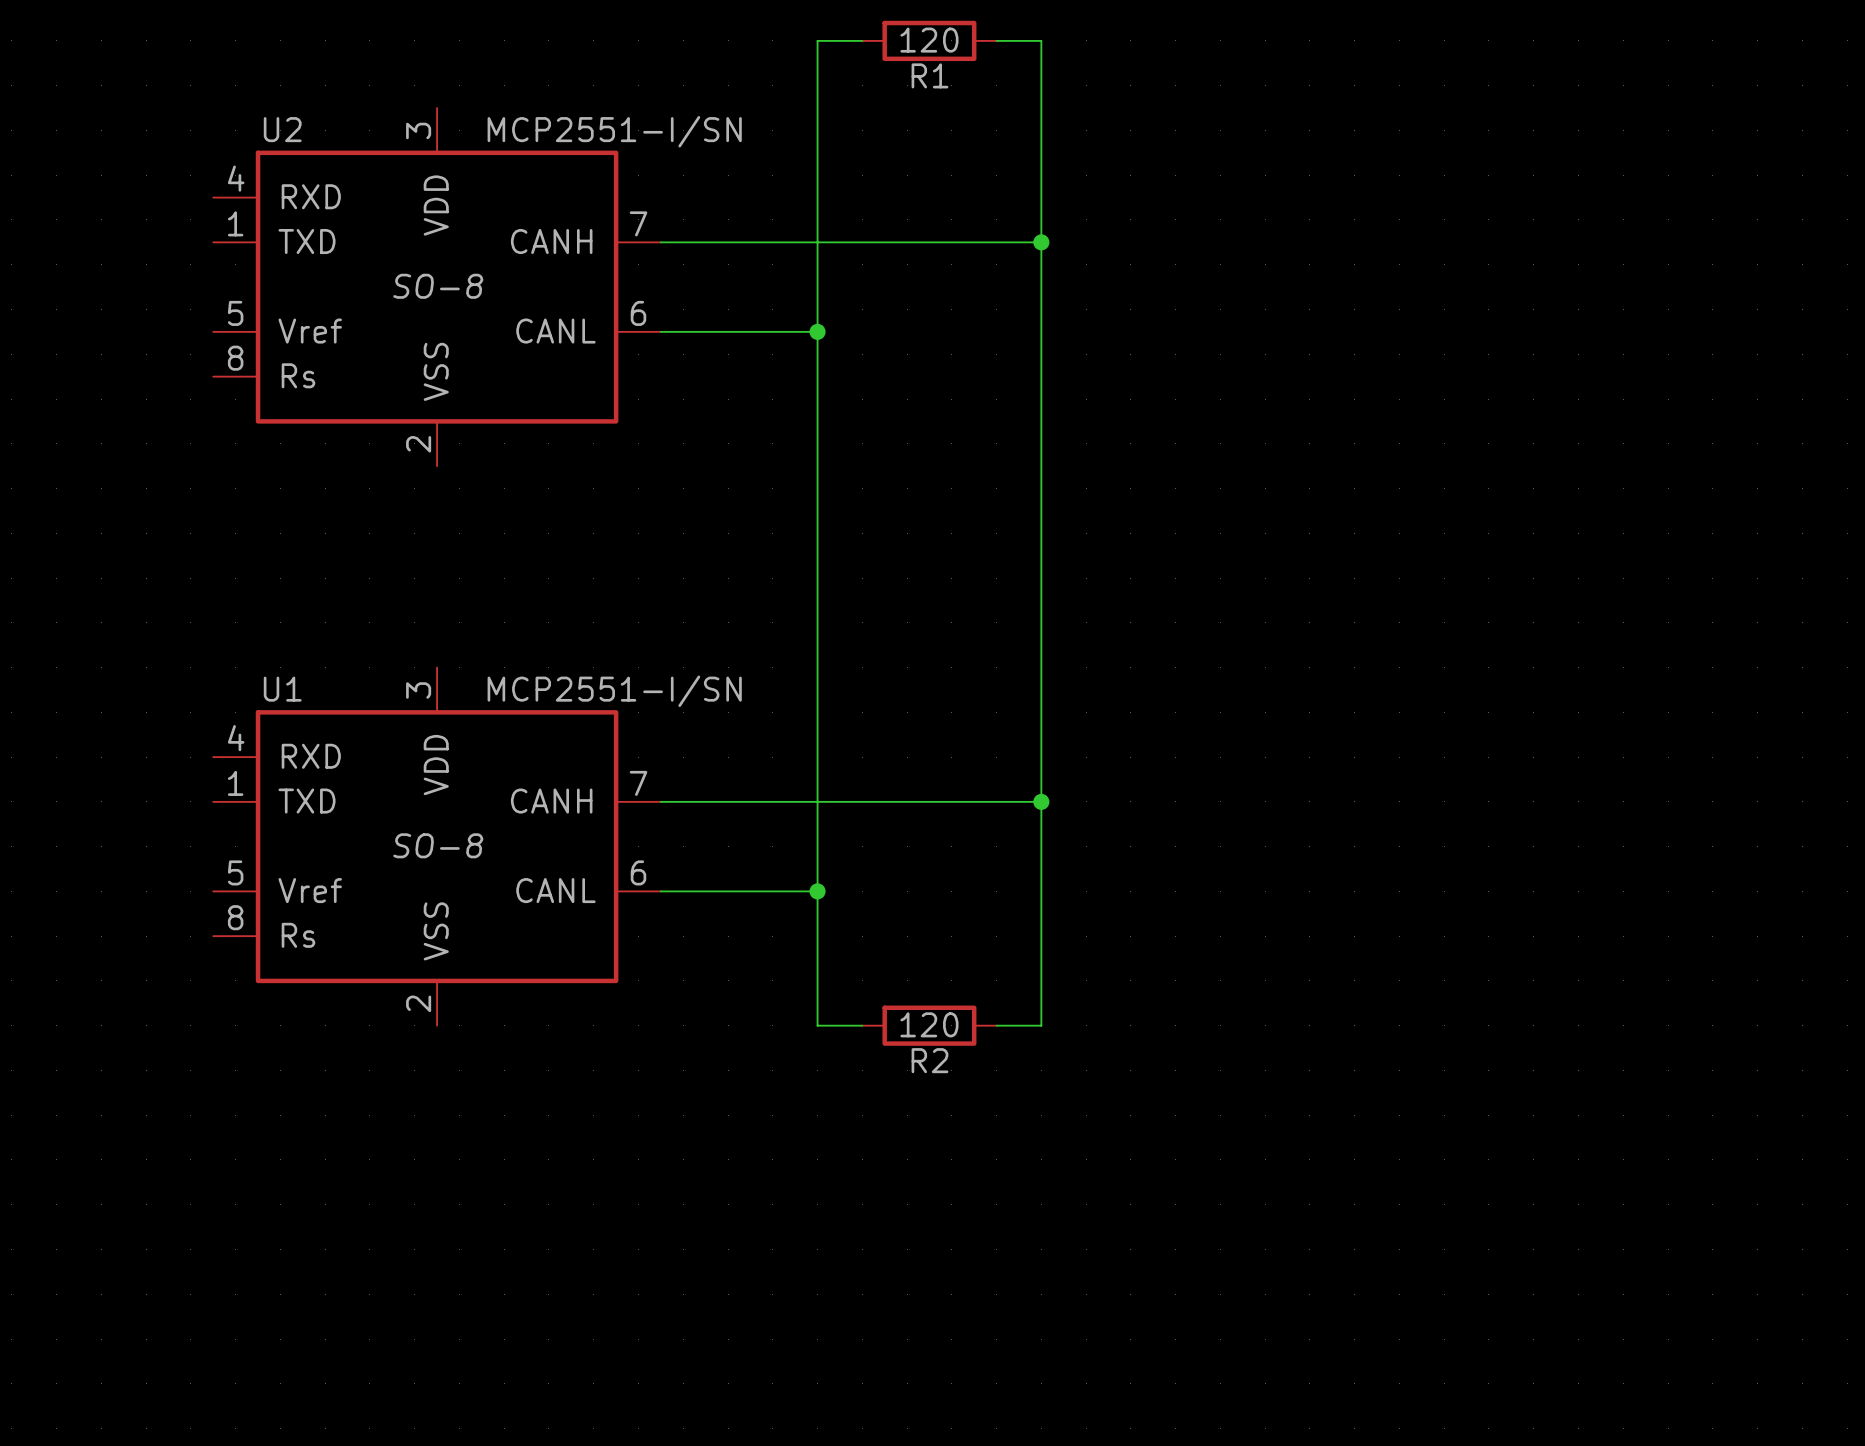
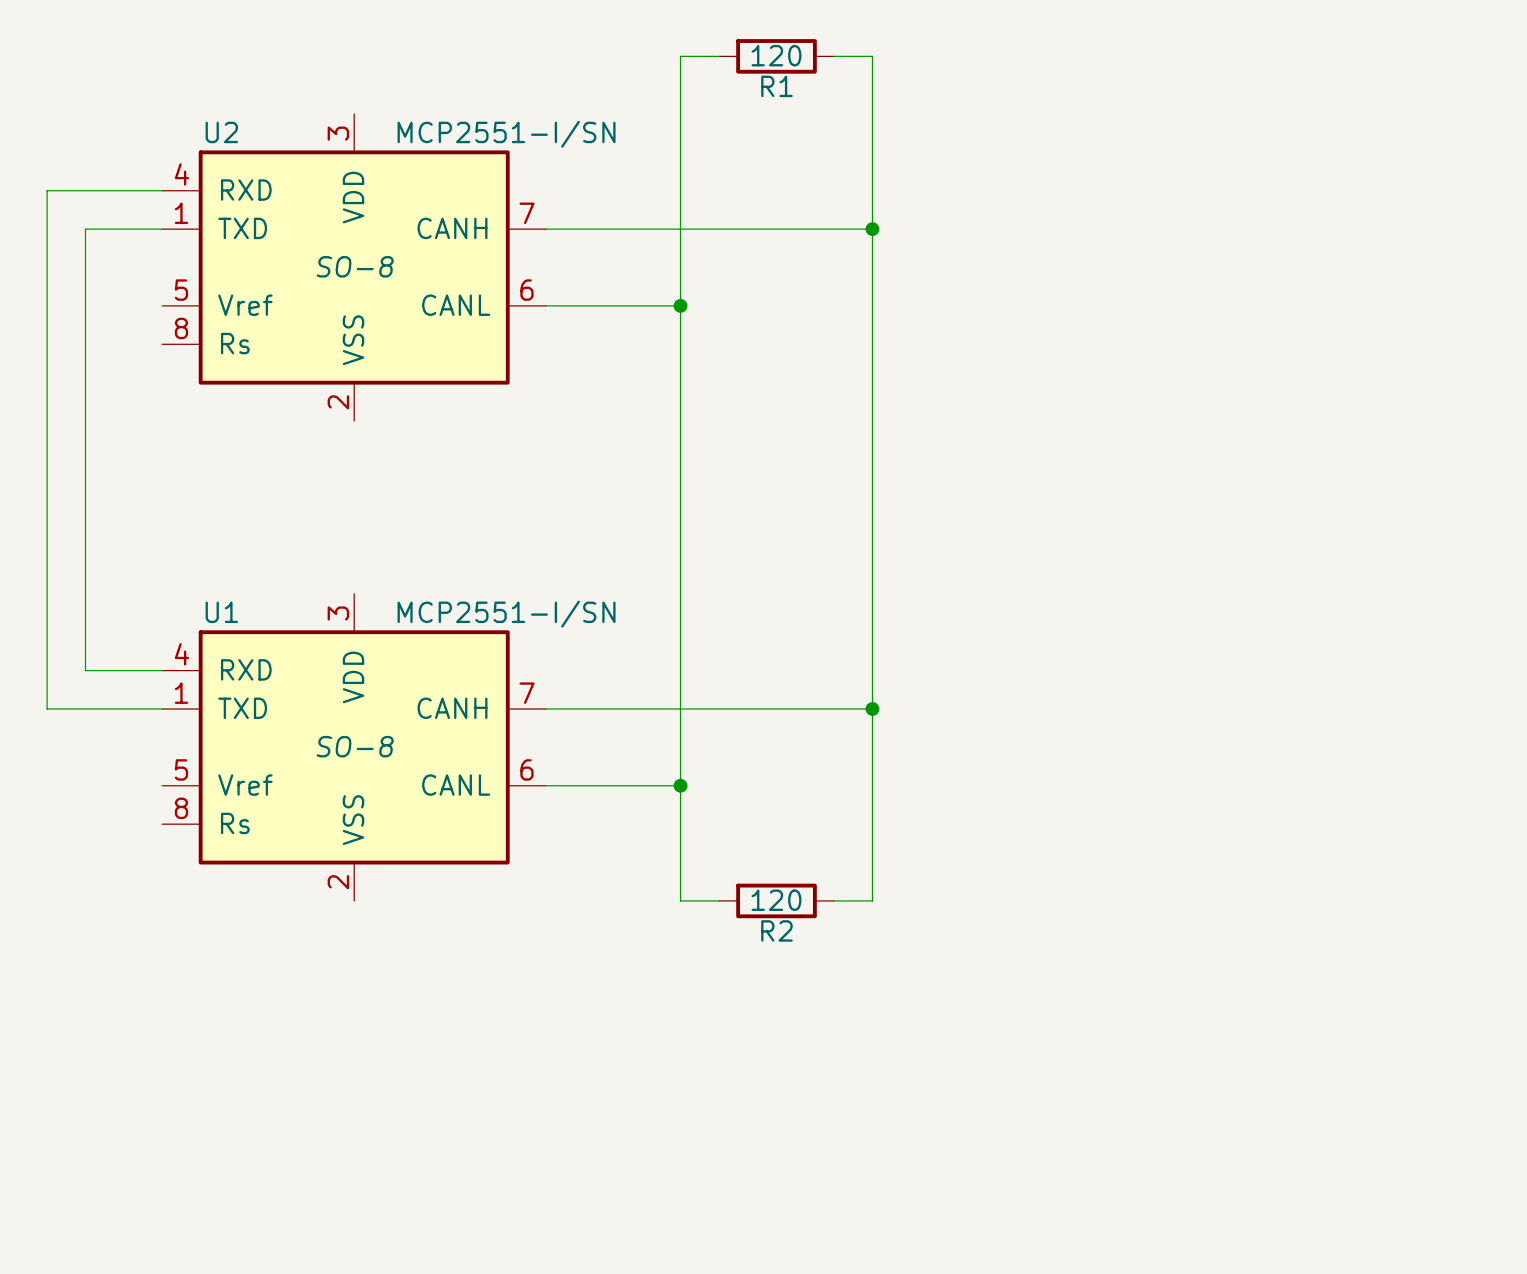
wire: none -> (162, 190) (47, 190) (47, 709) (162, 709)
wire: none -> (162, 229) (85, 229) (85, 670) (162, 670)

